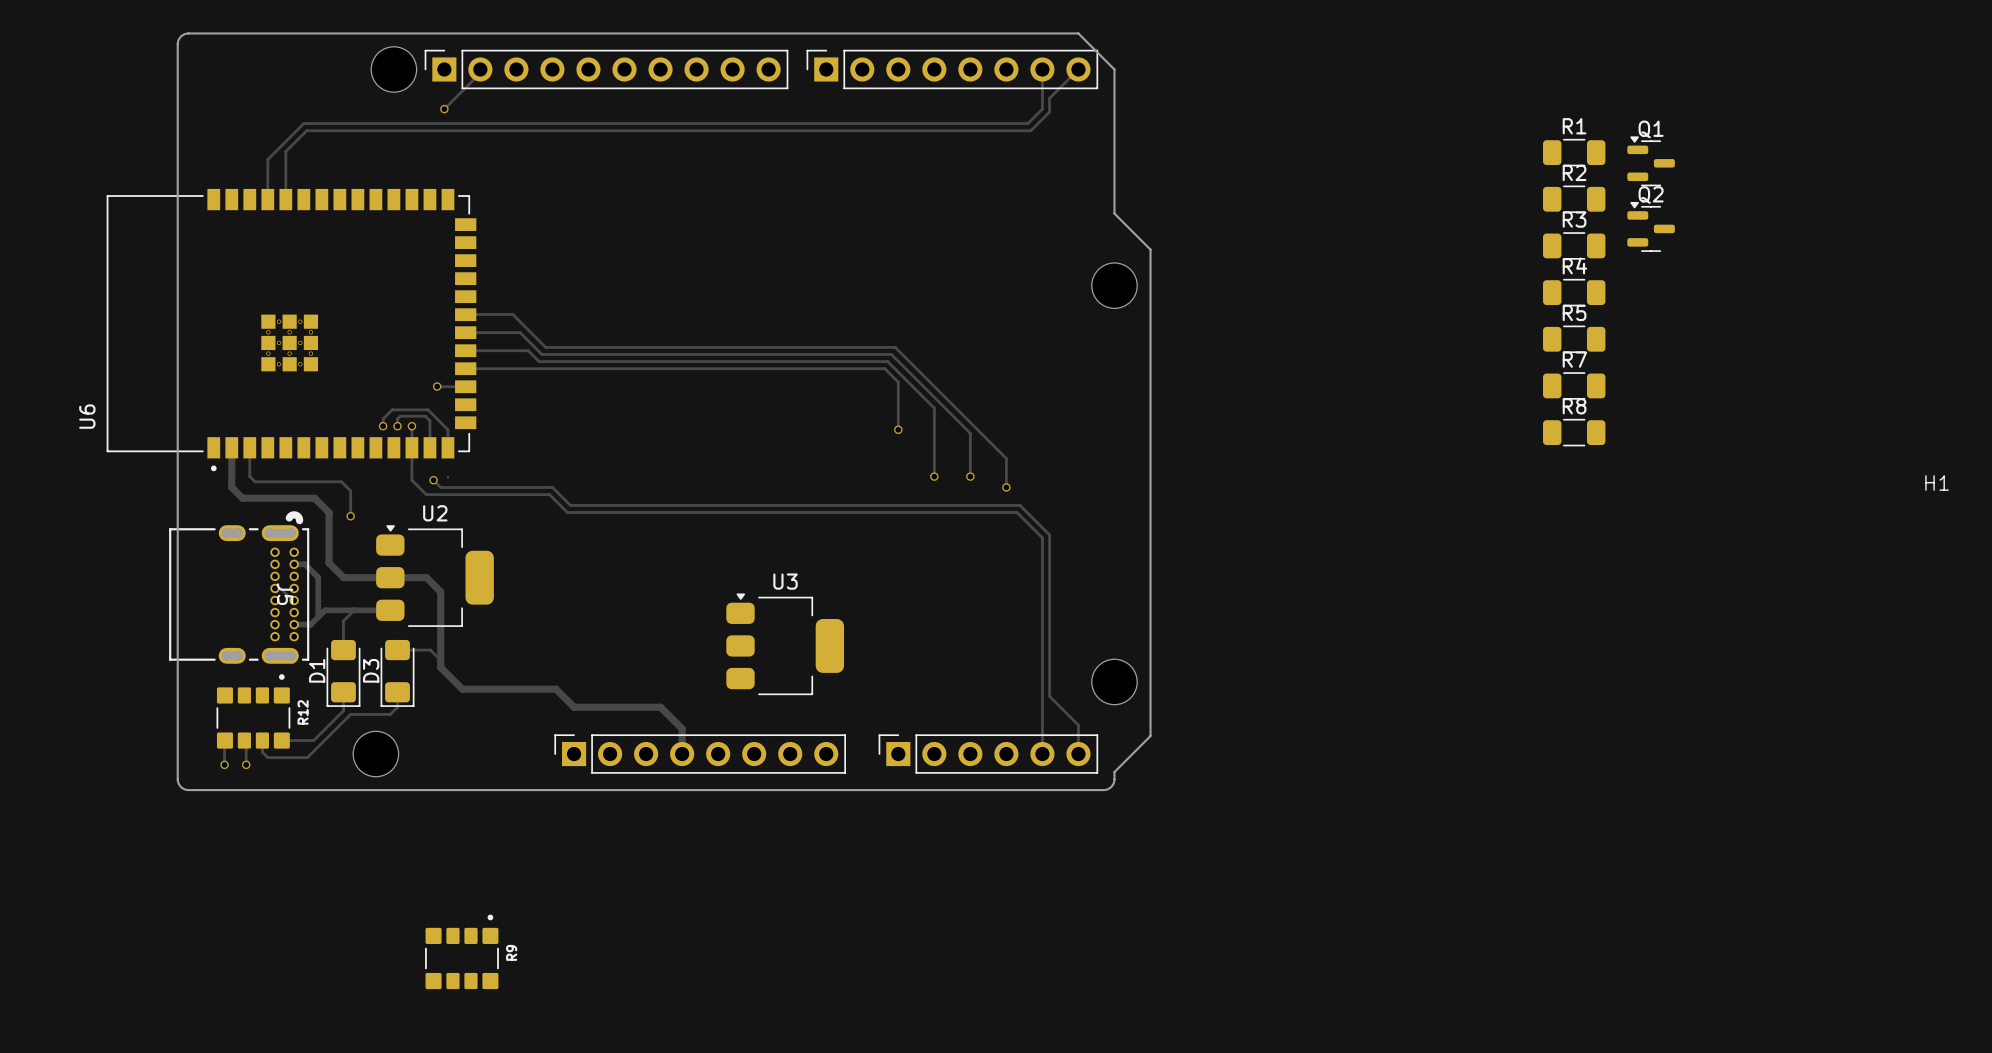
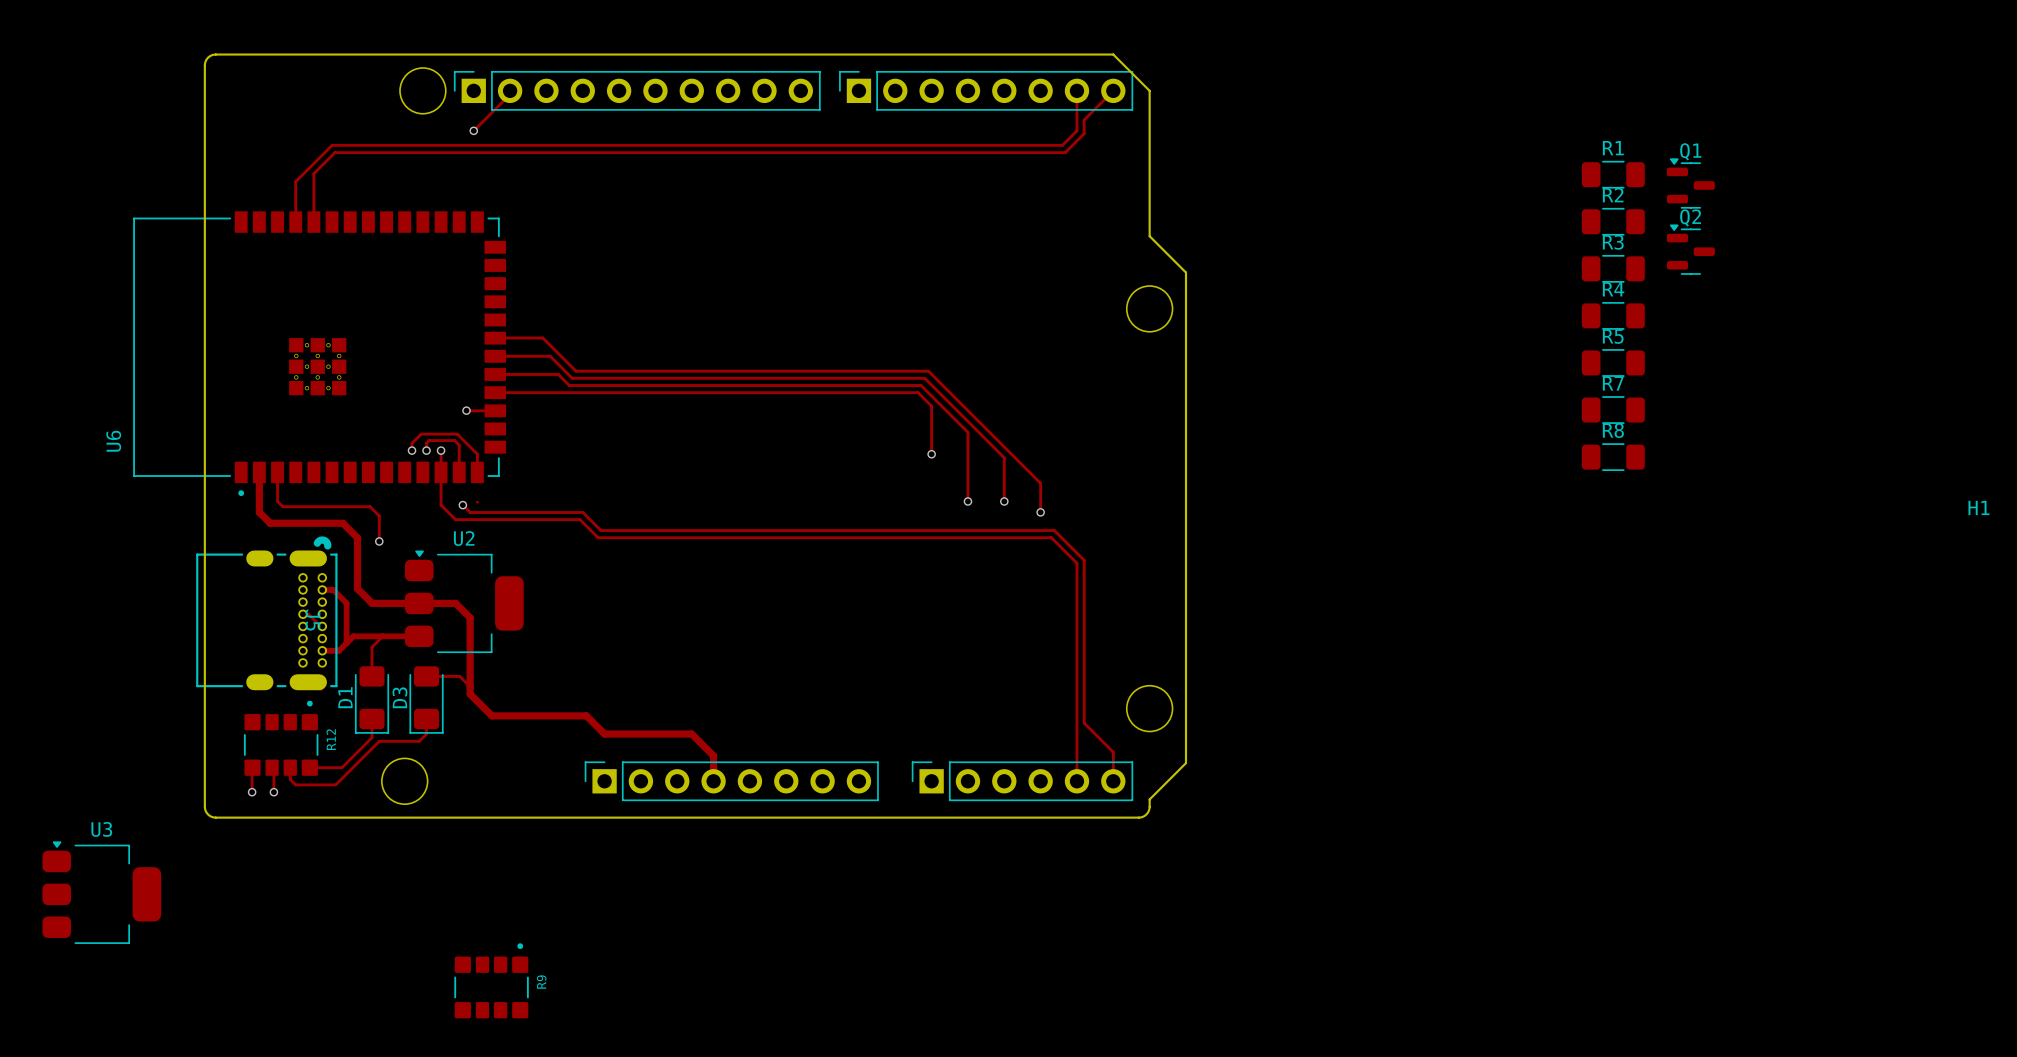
U3 position: (785, 644) -> (101, 892)

